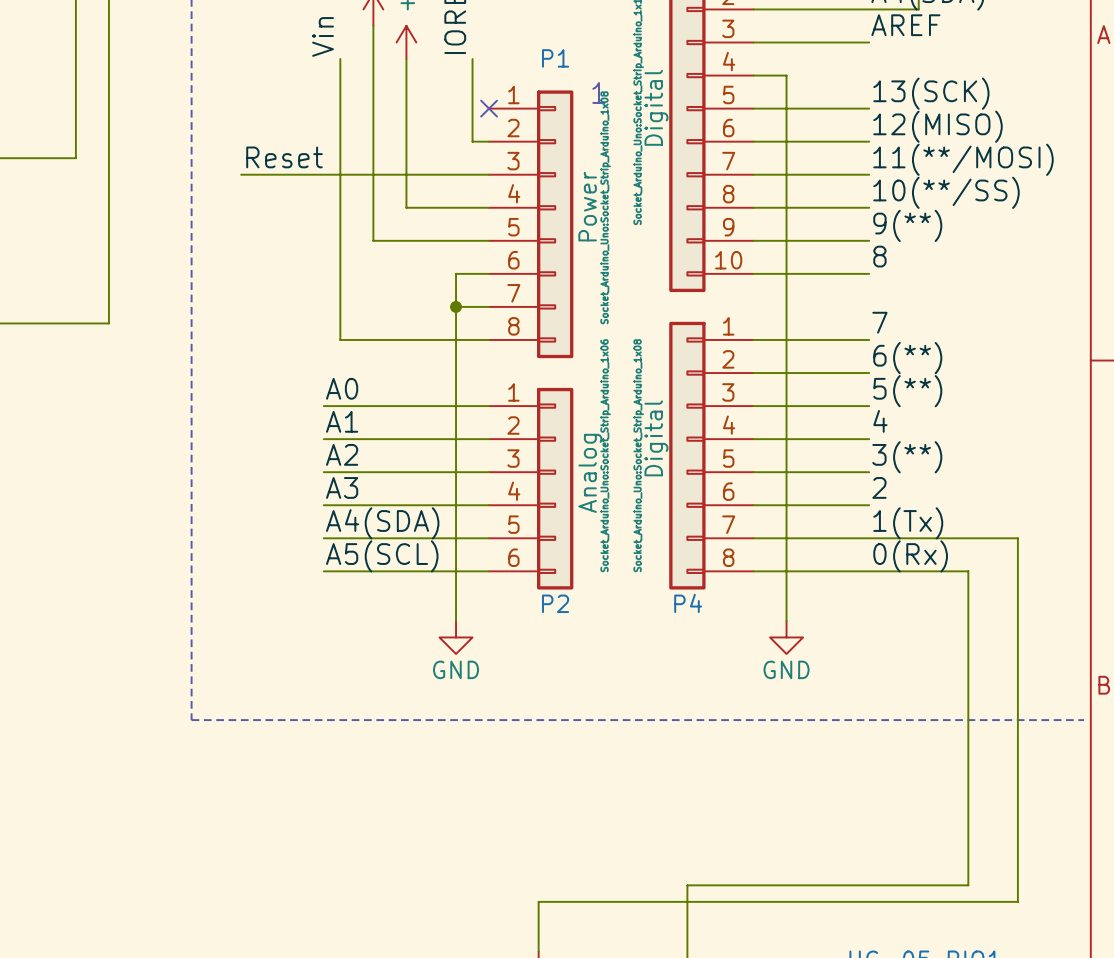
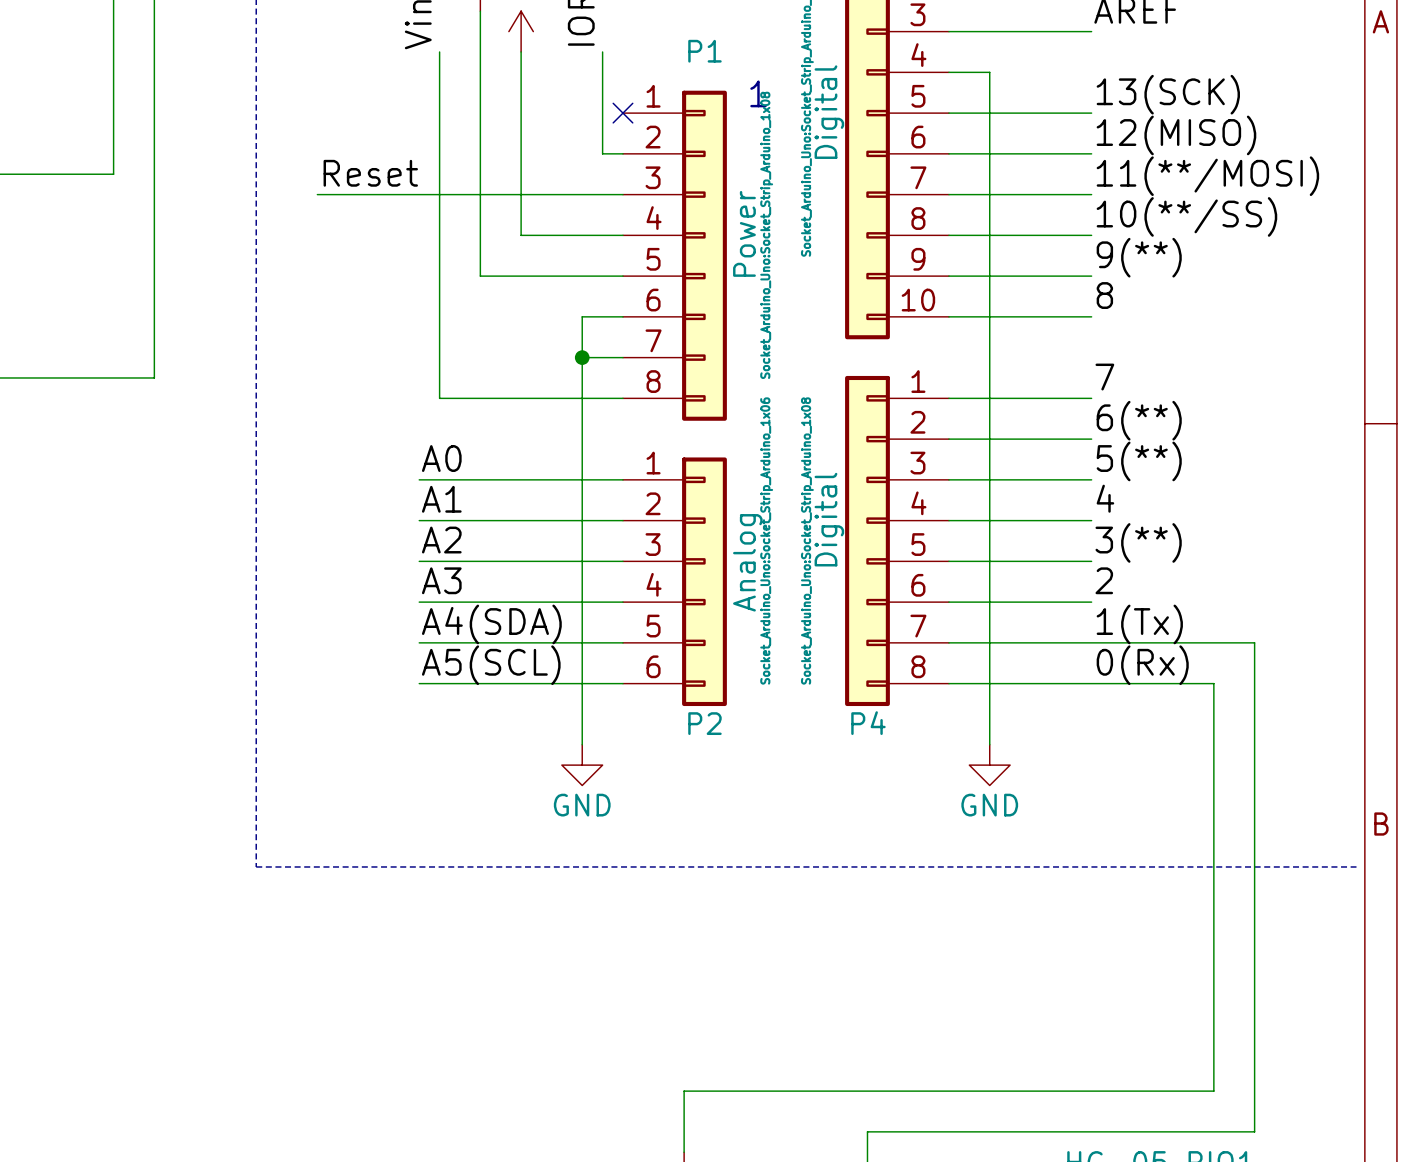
wire: (1001, 538) (1017, 538) (1017, 901) (968, 901) -> (1254, 642) (1254, 1131) (867, 1131)
wire: (968, 885) (687, 885) (687, 934) -> (1213, 1070) (1213, 1091)

